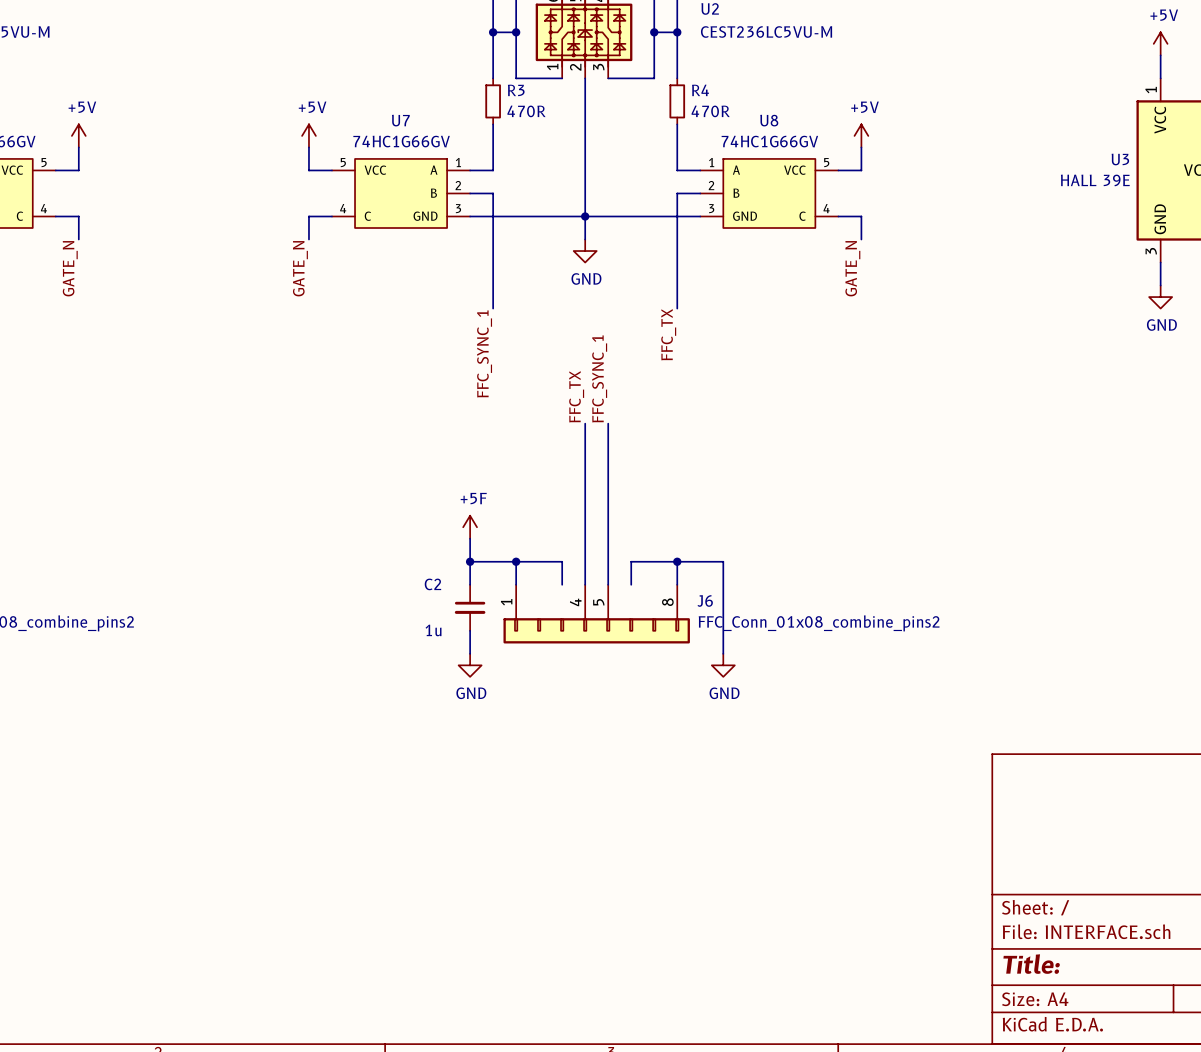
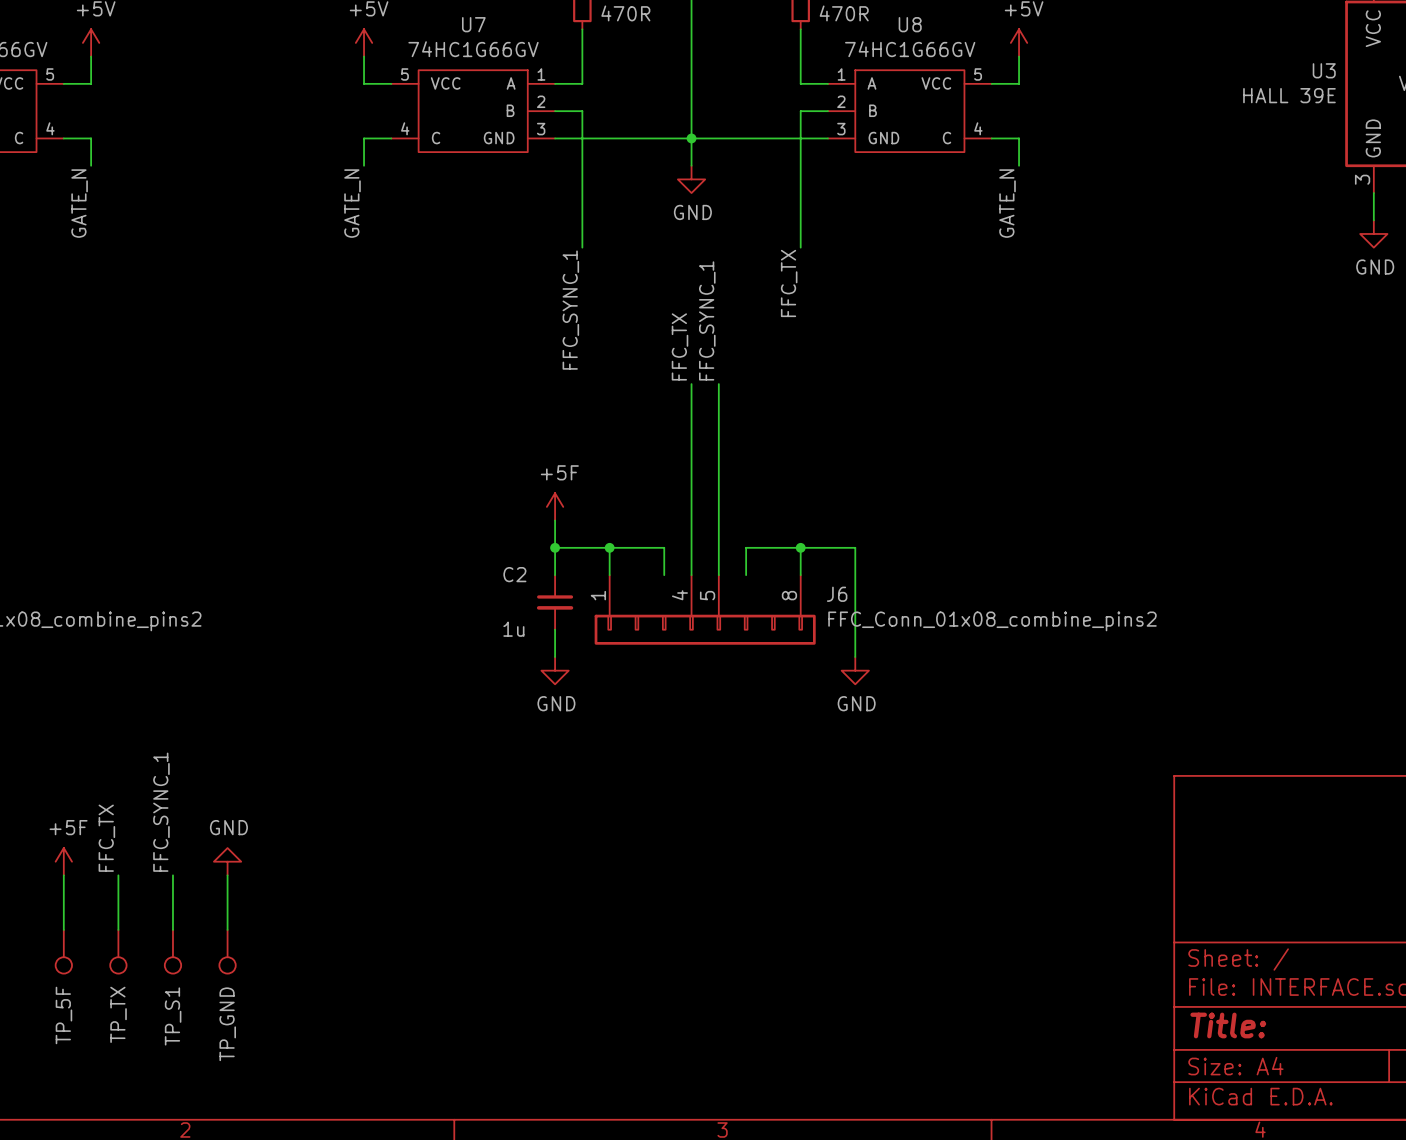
label: none -> FFC_SYNC_1 (161, 812)
label: none -> FFC_TX (106, 838)
power symbol: none -> +5F (63, 861)
power symbol: none -> GND (227, 861)
wire: none -> (63, 875) (63, 929)
wire: none -> (118, 875) (118, 929)
wire: none -> (172, 875) (172, 929)
wire: none -> (227, 875) (227, 929)
part: none -> TP_5F (63, 951)
part: none -> TP_TX (118, 951)
part: none -> TP_S1 (172, 951)
part: none -> TP_GND (227, 951)

